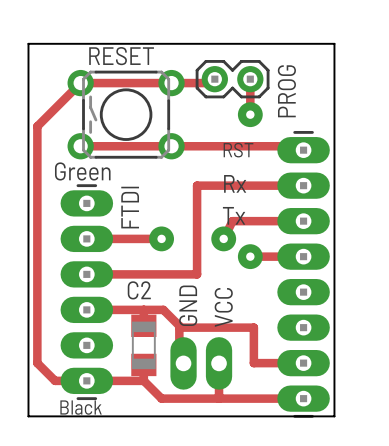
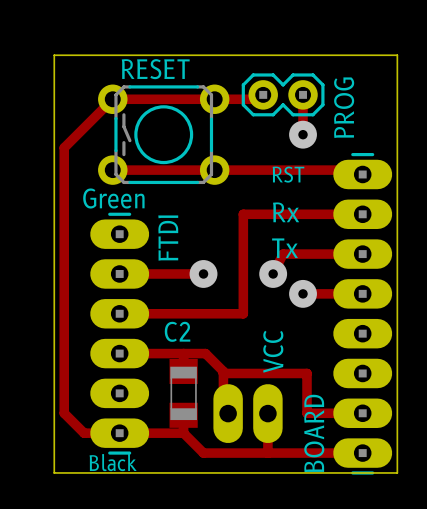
text: GND (188, 305) -> none
BOARD name: none -> BOARD (314, 433)

